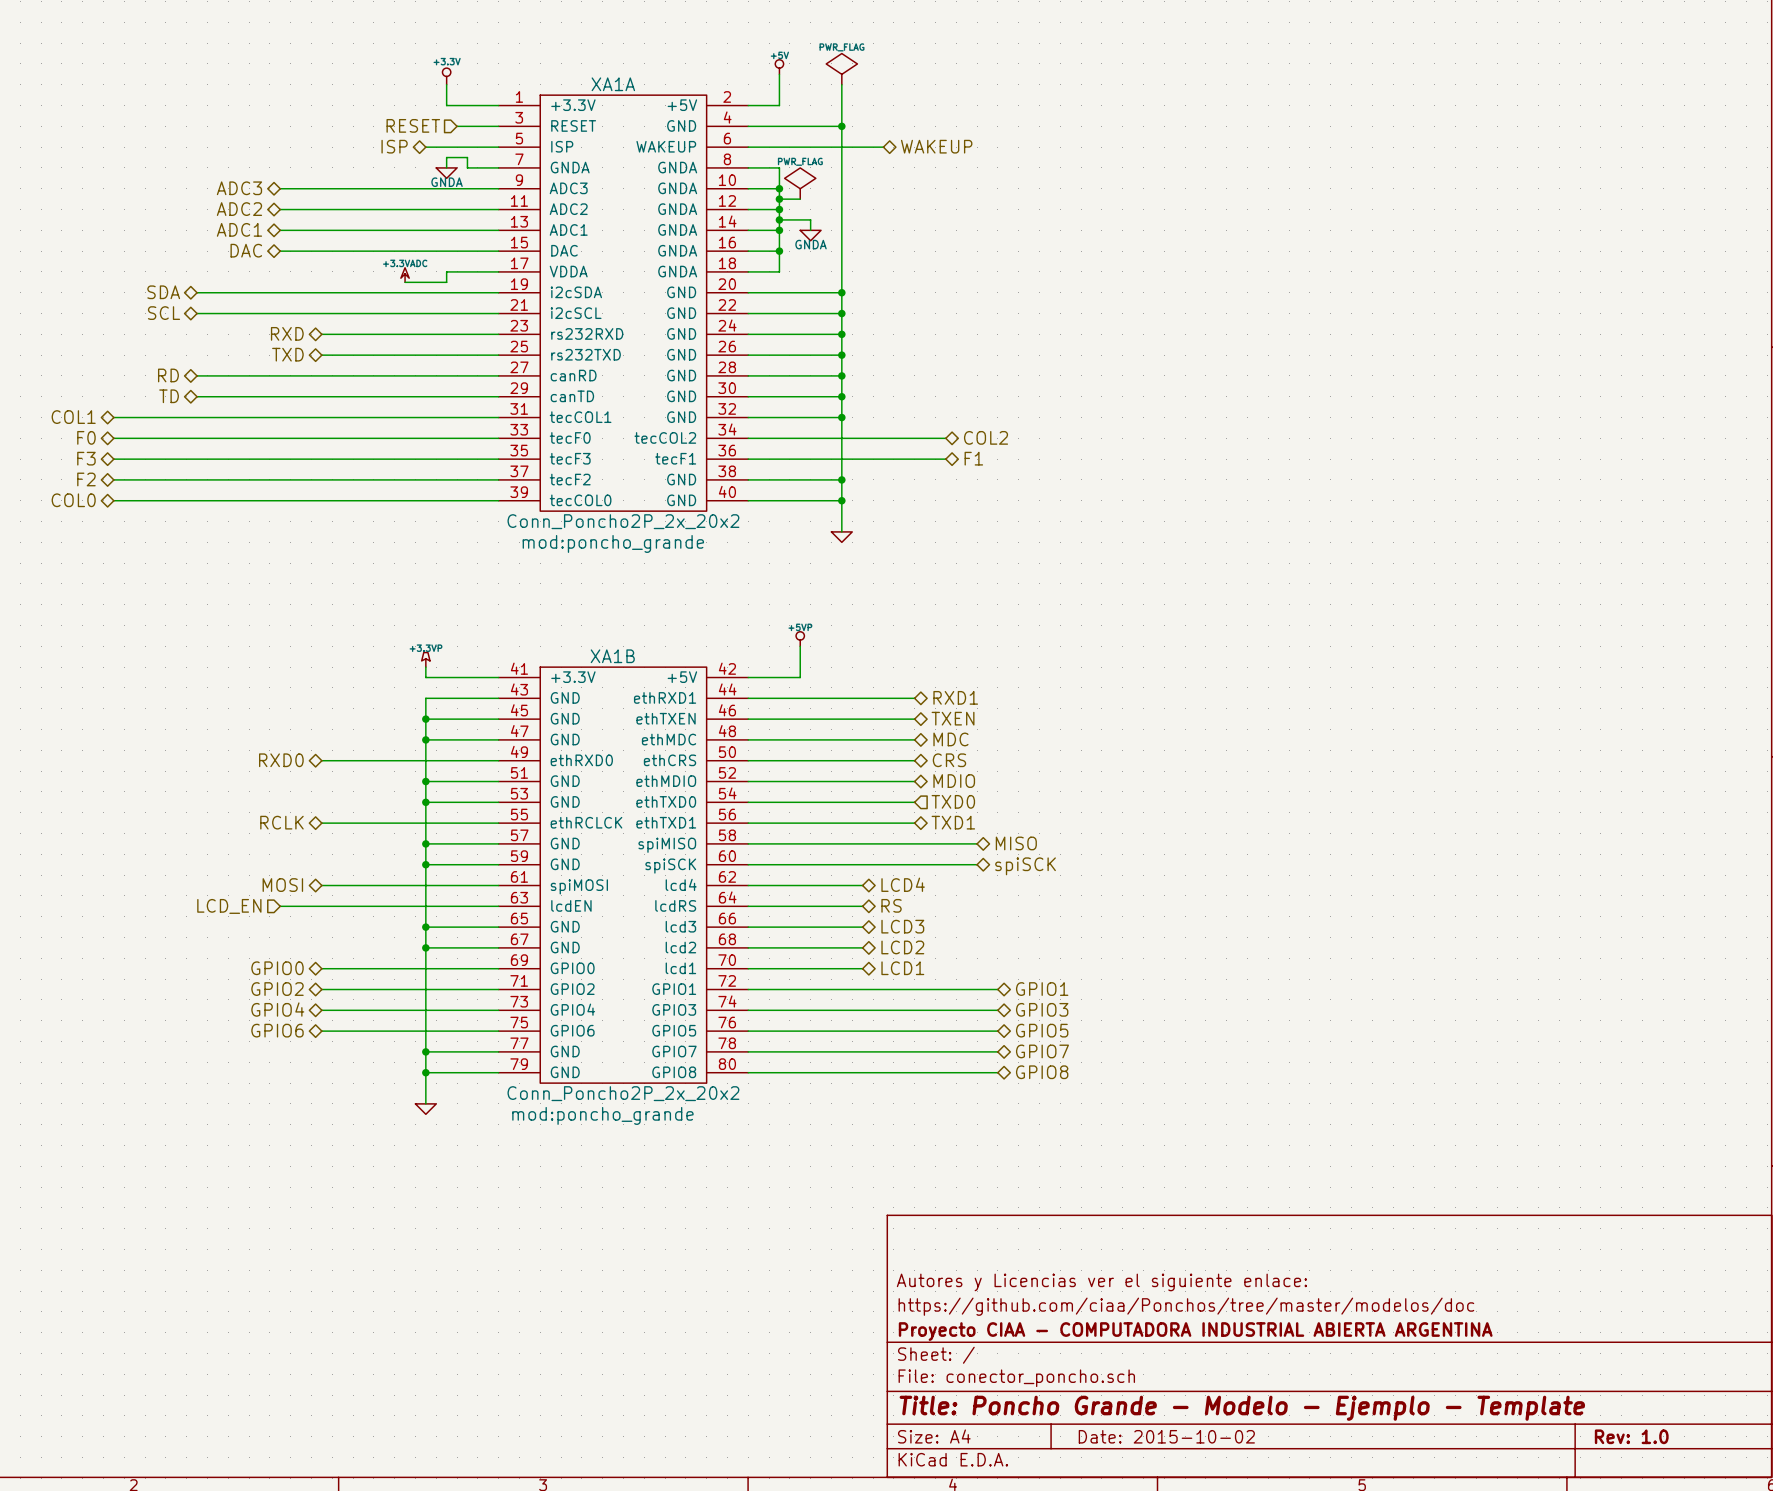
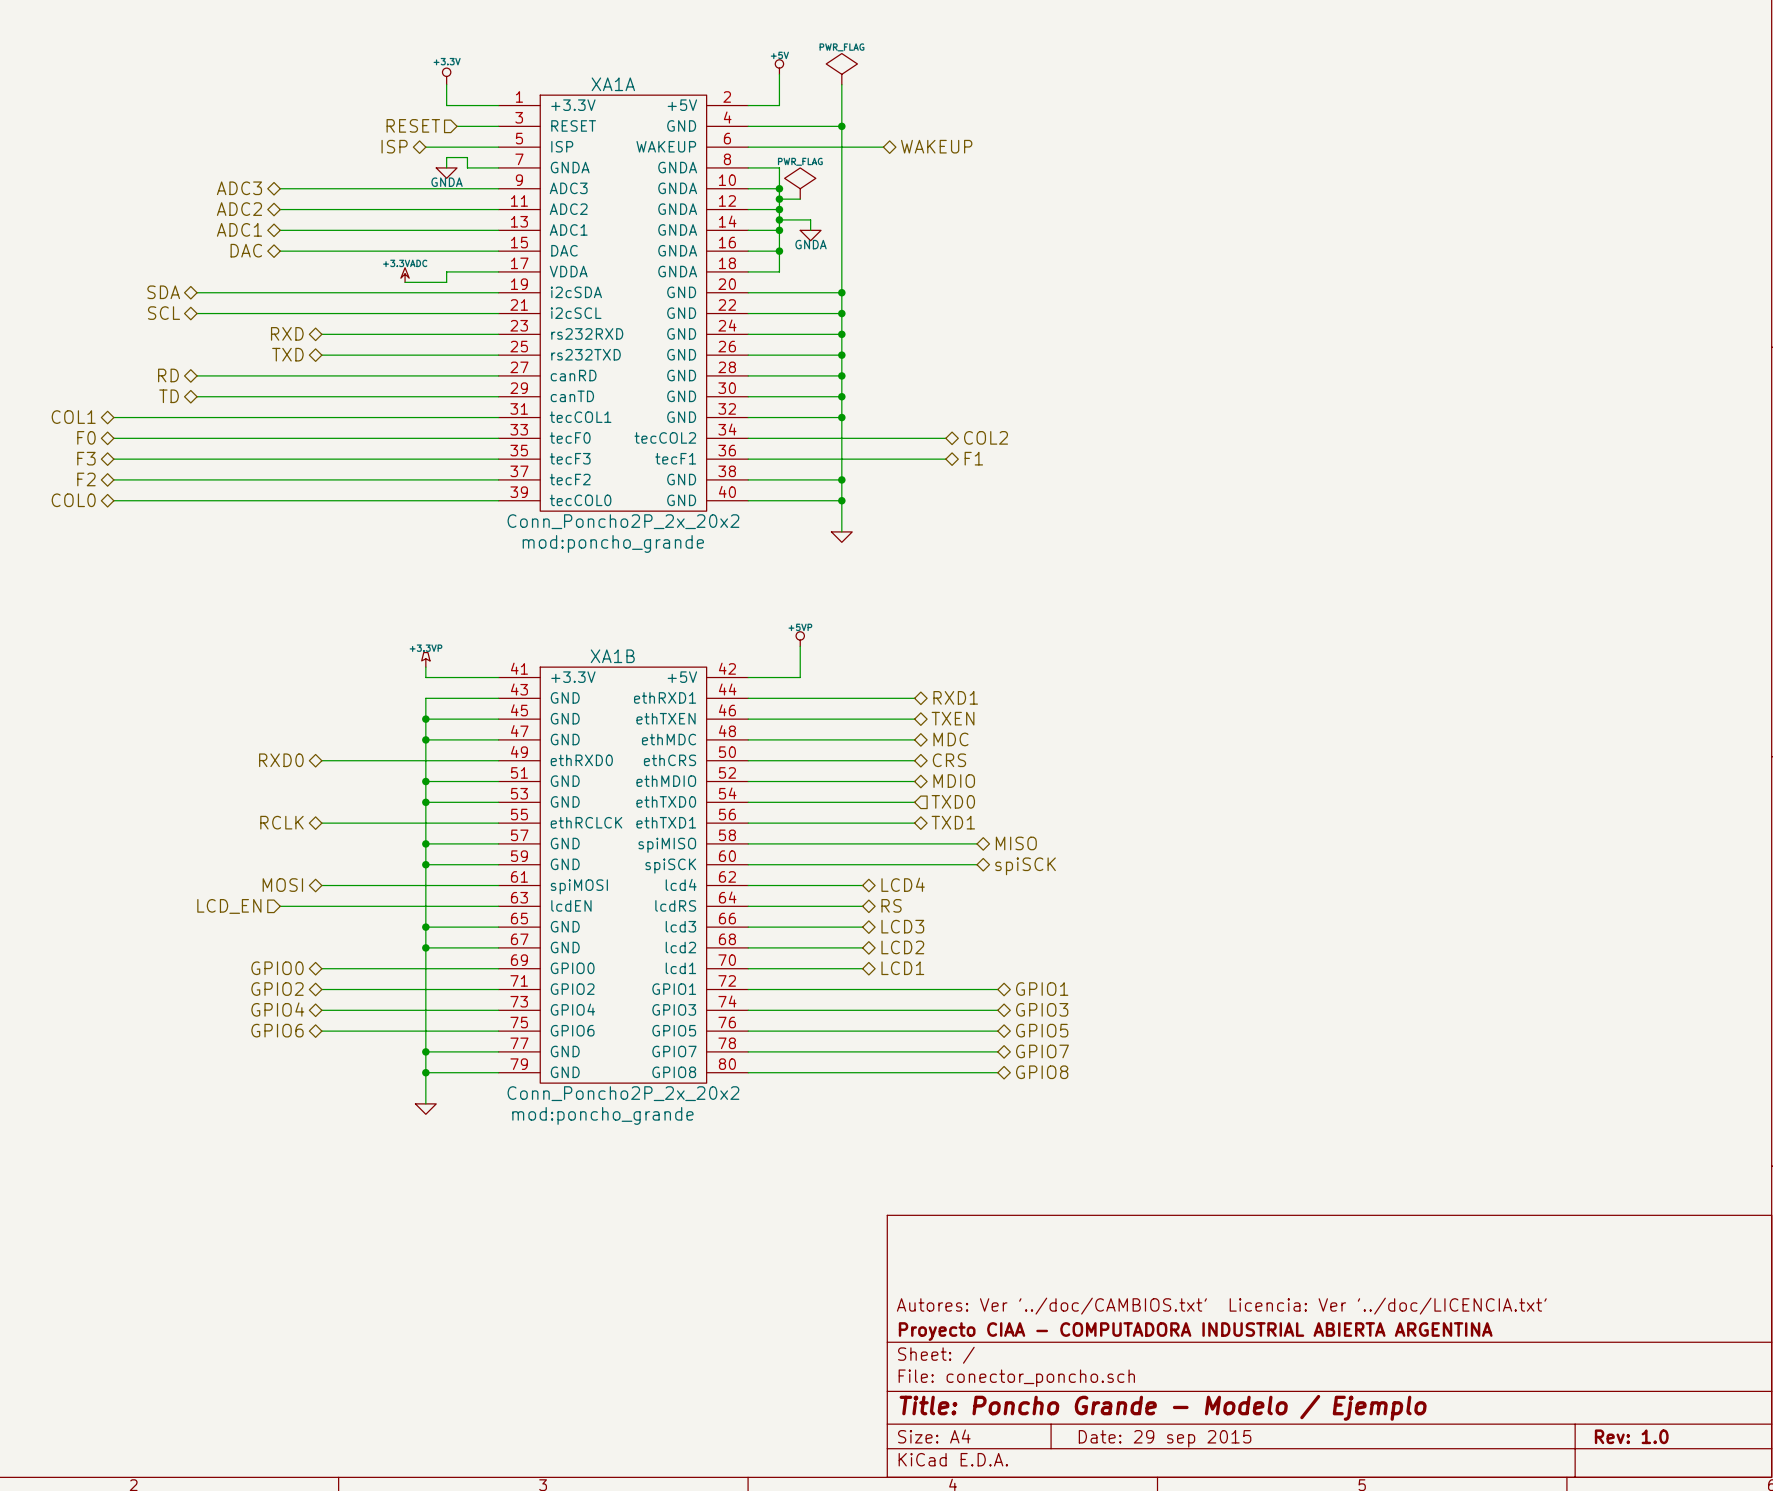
title block: Autores y Licencias ver el siguiente enlace: (1101, 1282) -> none
title block: https://github.com/ciaa/Ponchos/tree/master/modelos/doc (1186, 1306) -> Autores: Ver '../doc/CAMBIOS.txt' Licencia: Ver '../doc/LICENCIA.txt' (1221, 1306)
title block: Title: Poncho Grande - Modelo - Ejemplo - Template (1242, 1408) -> Title: Poncho Grande - Modelo / Ejemplo (1163, 1407)
title block: Date: 2015-10-02 (1166, 1436) -> Date: 29 sep 2015 (1165, 1438)

